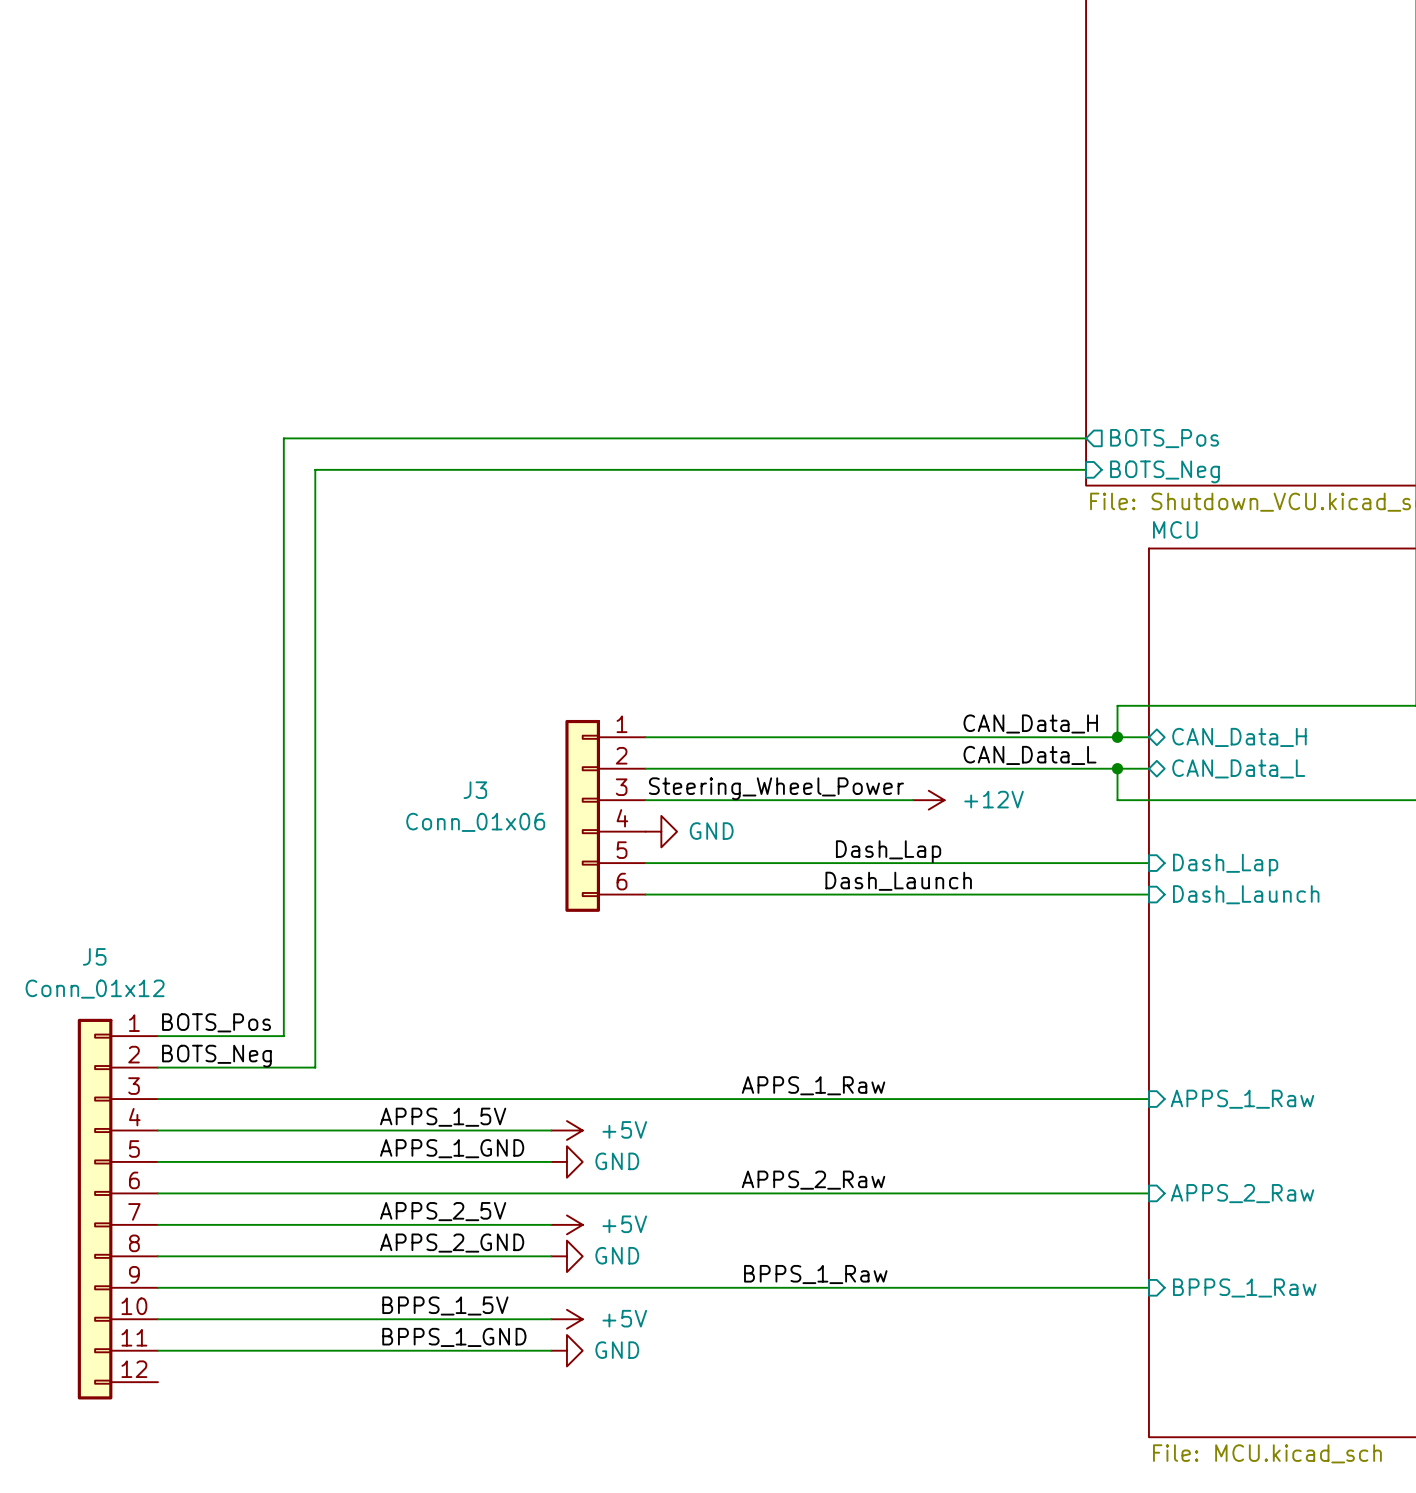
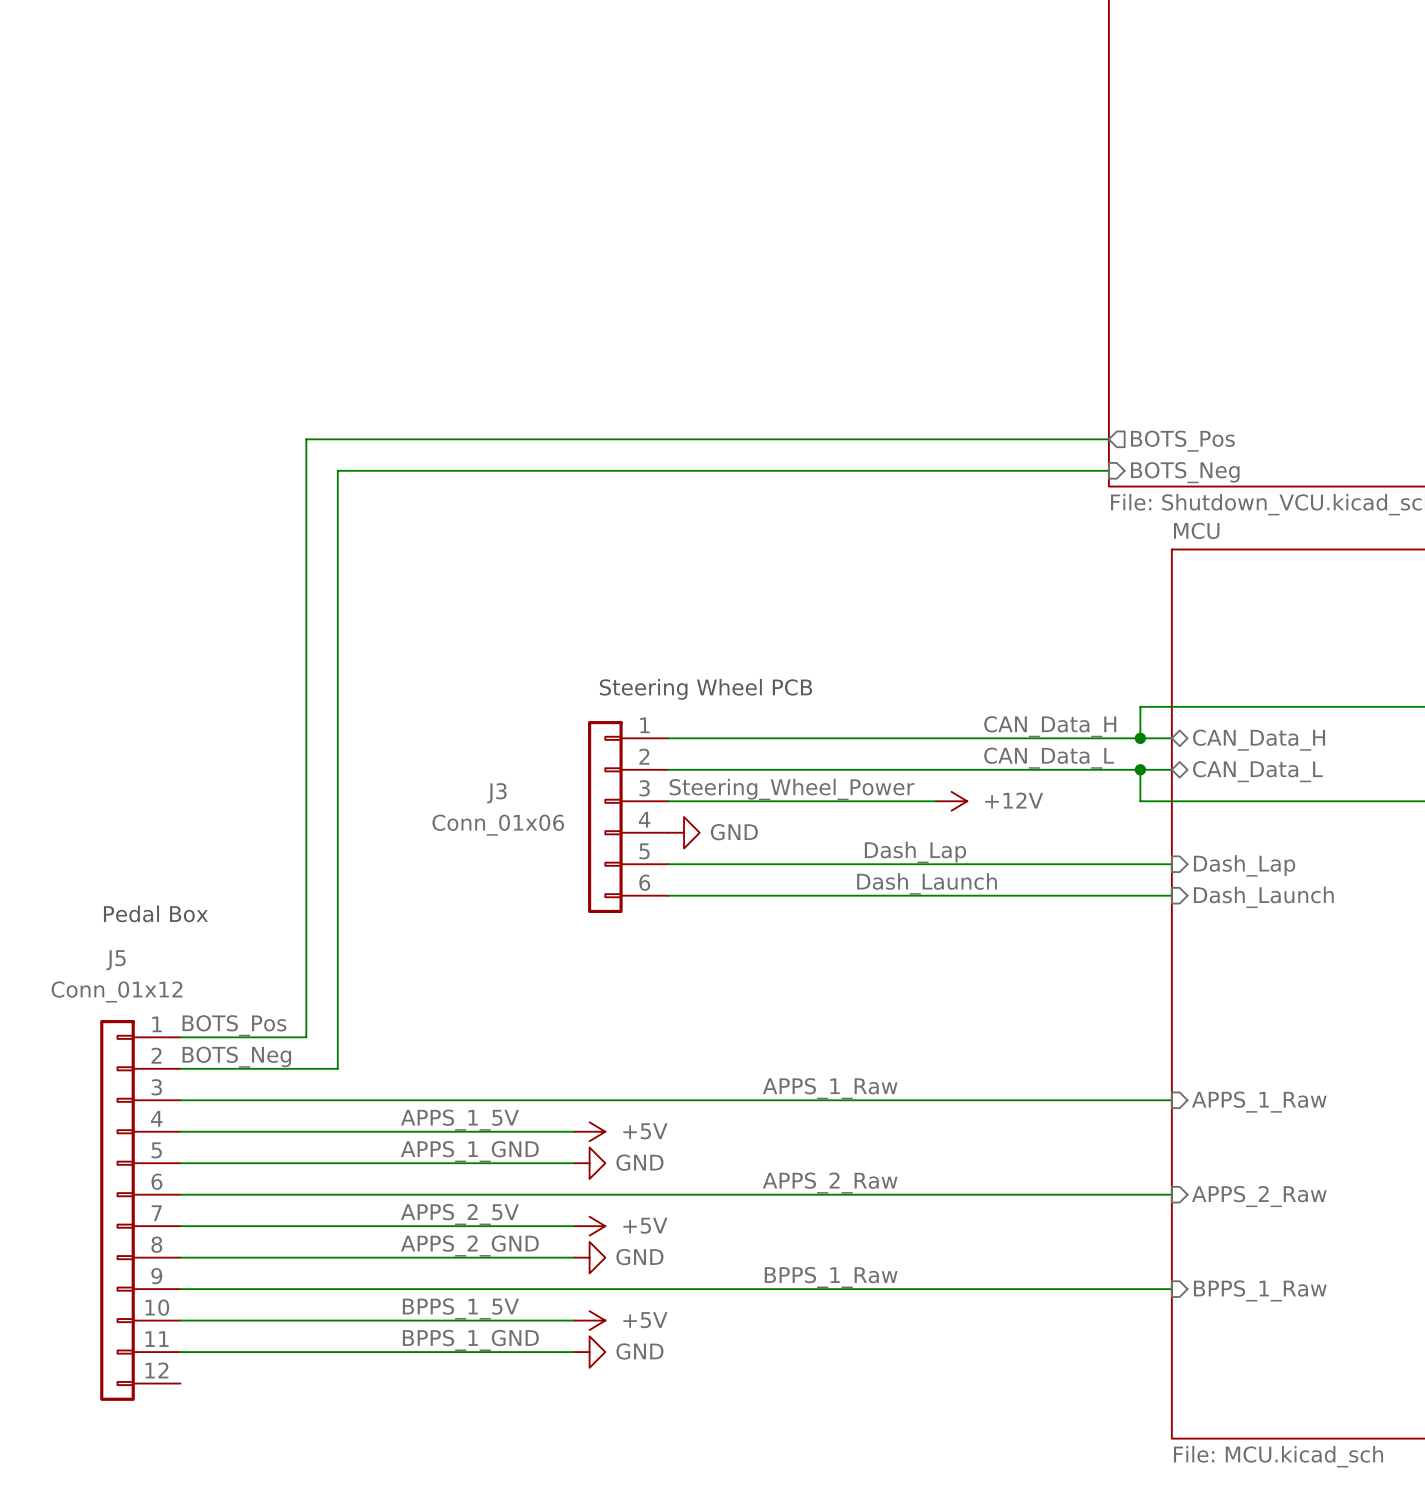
text: none -> Steering Wheel PCB (705, 689)
text: none -> Pedal Box (155, 913)

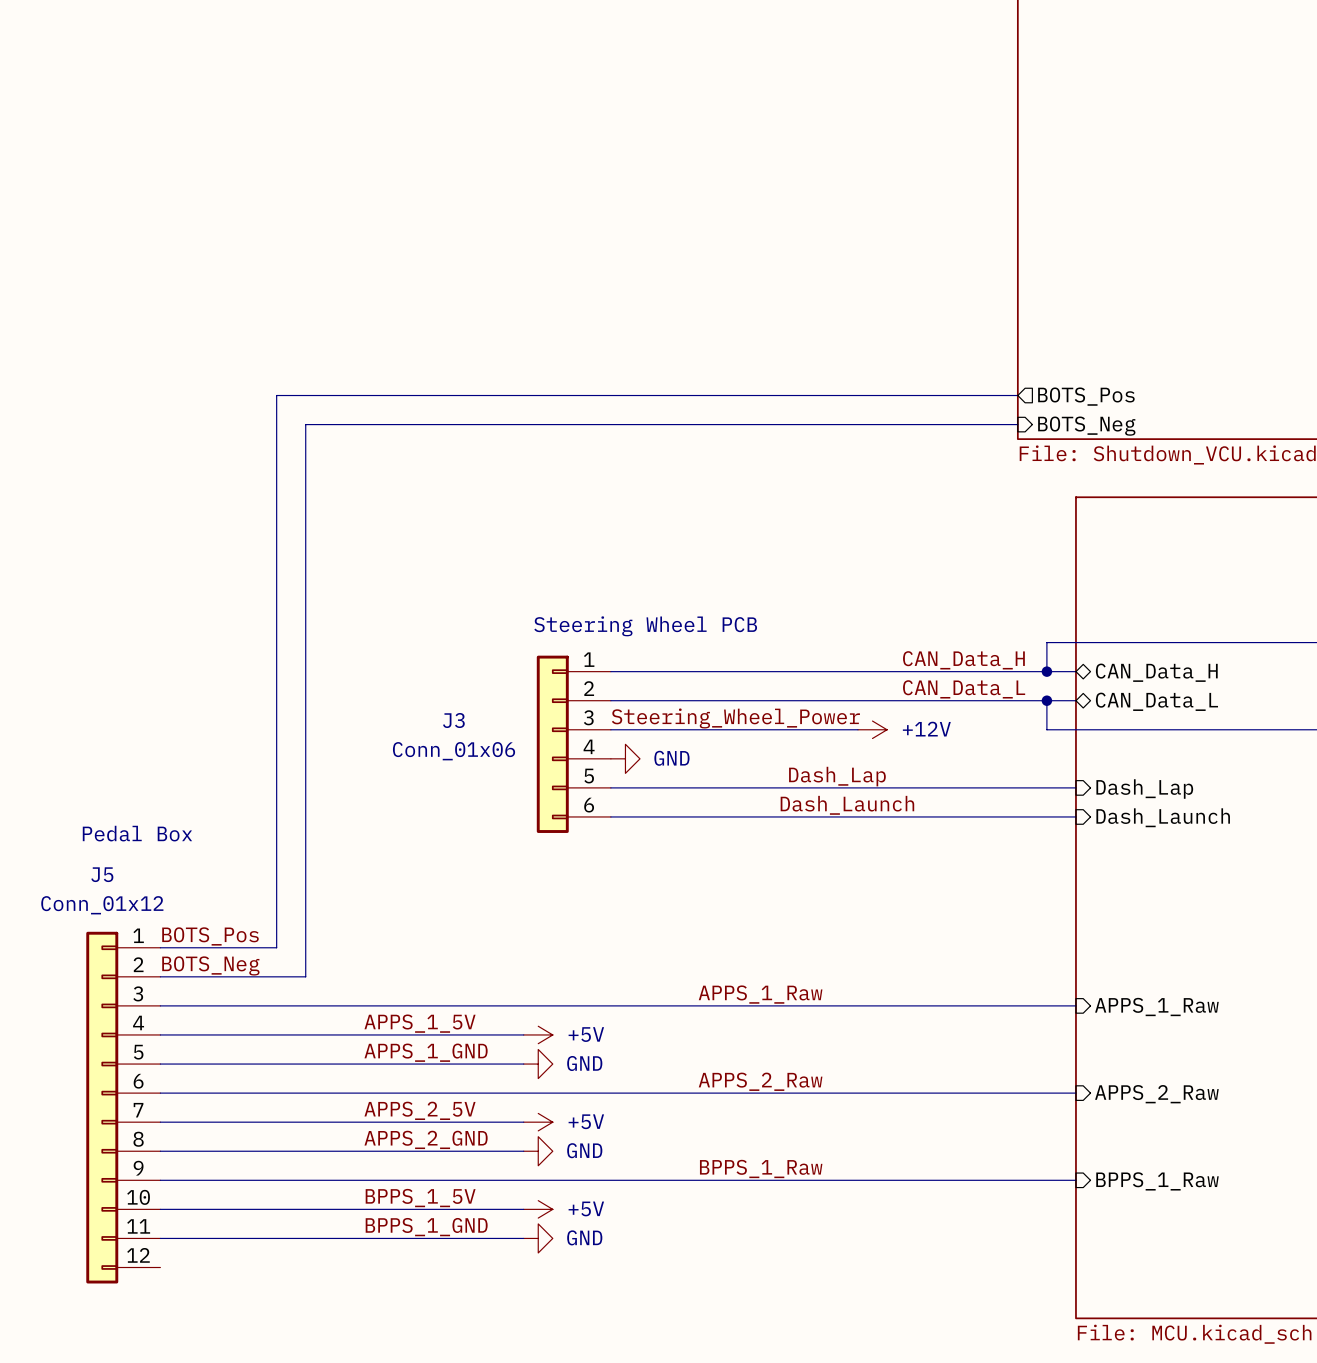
sheet MCU name: MCU (1196, 530) -> none

